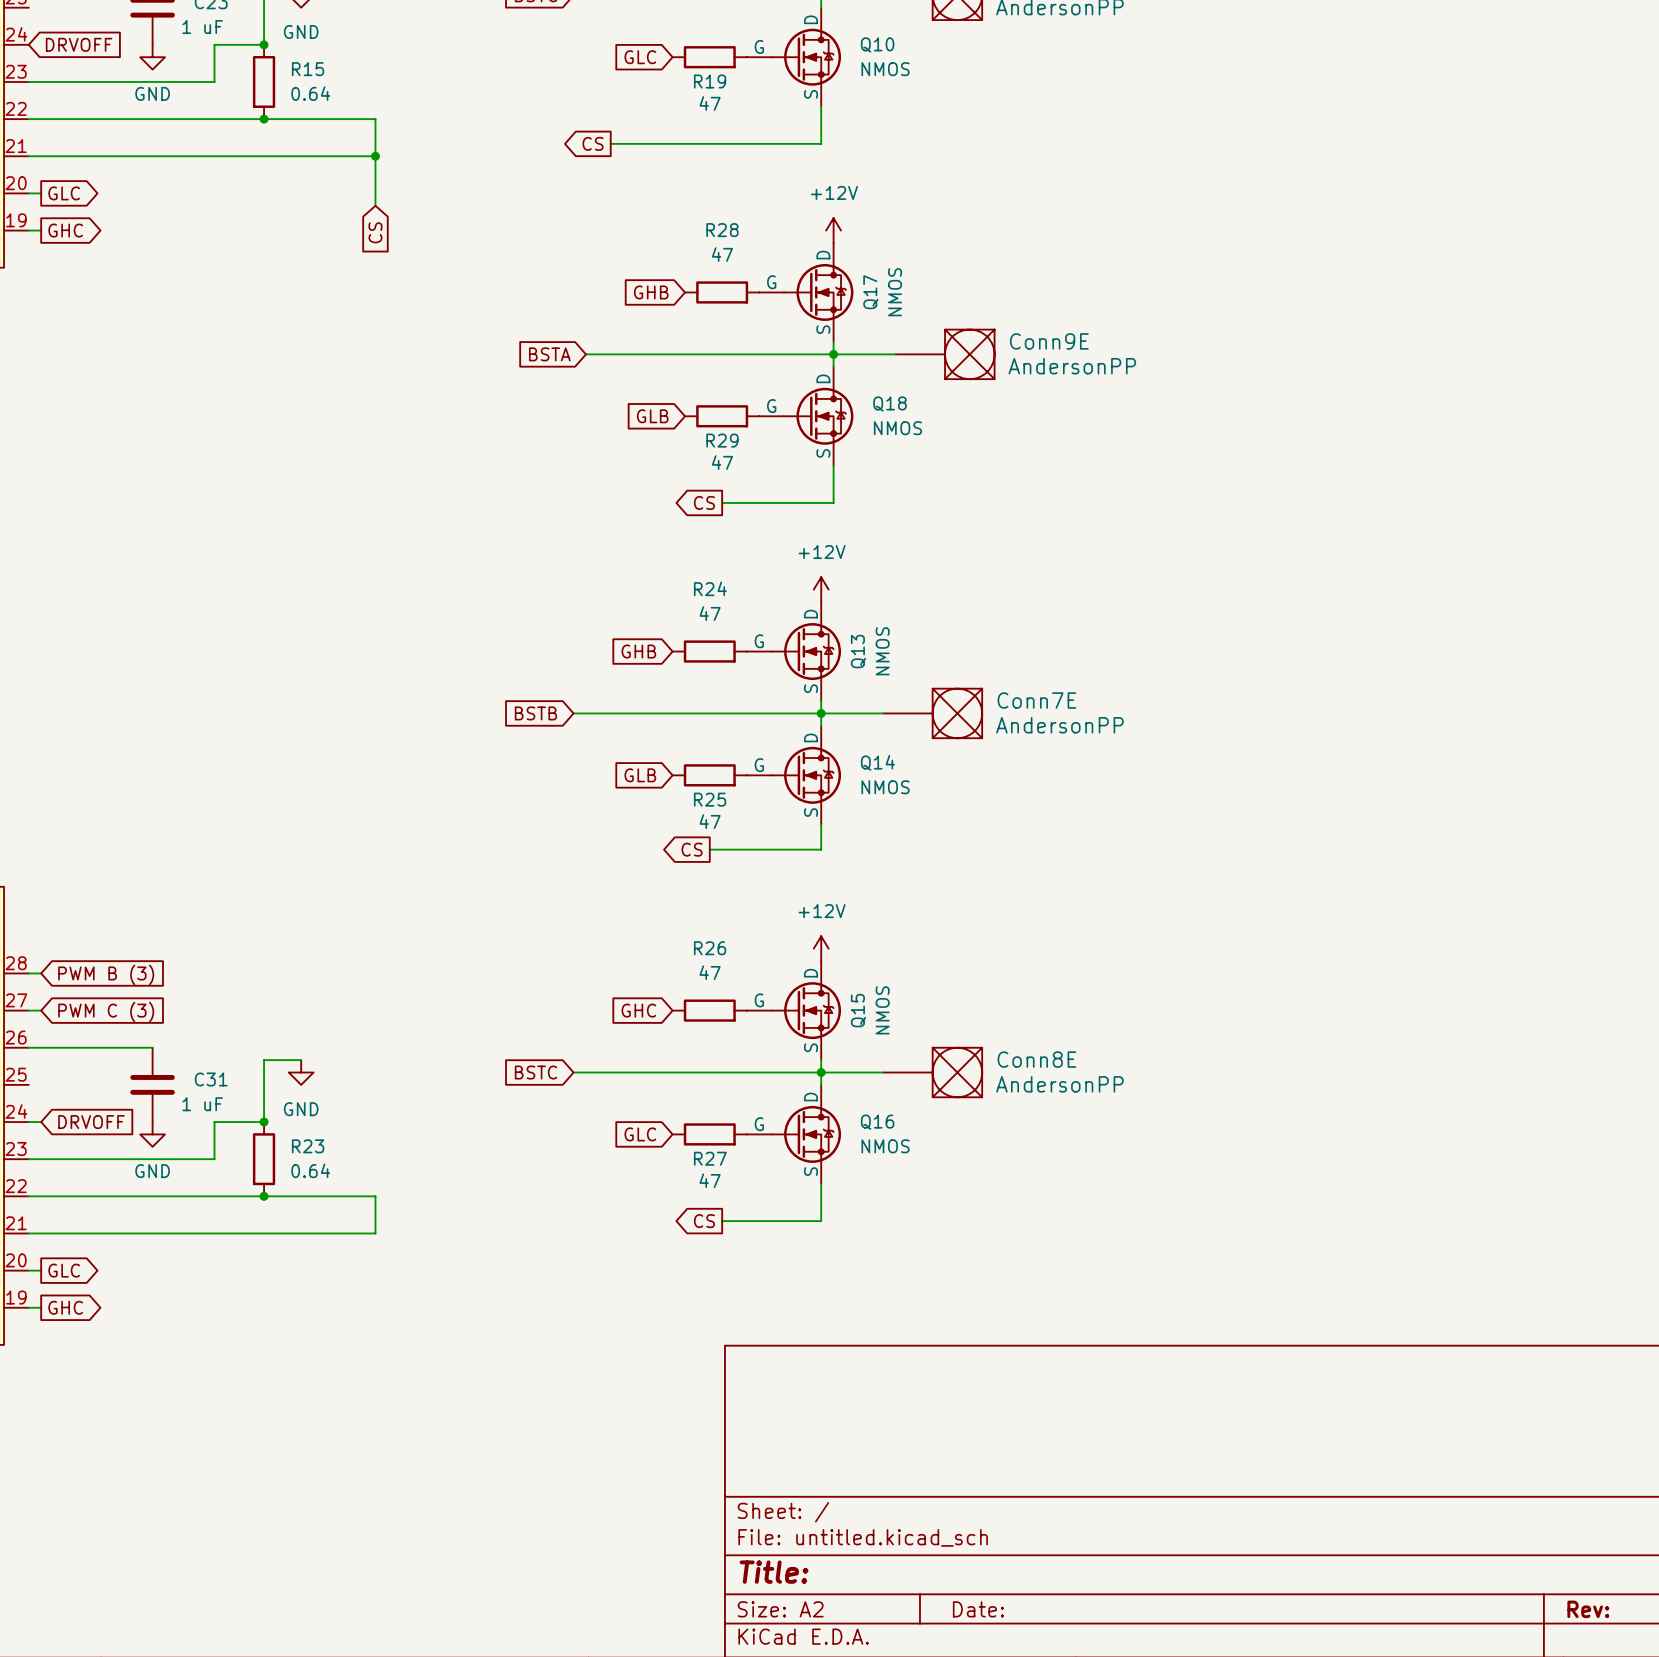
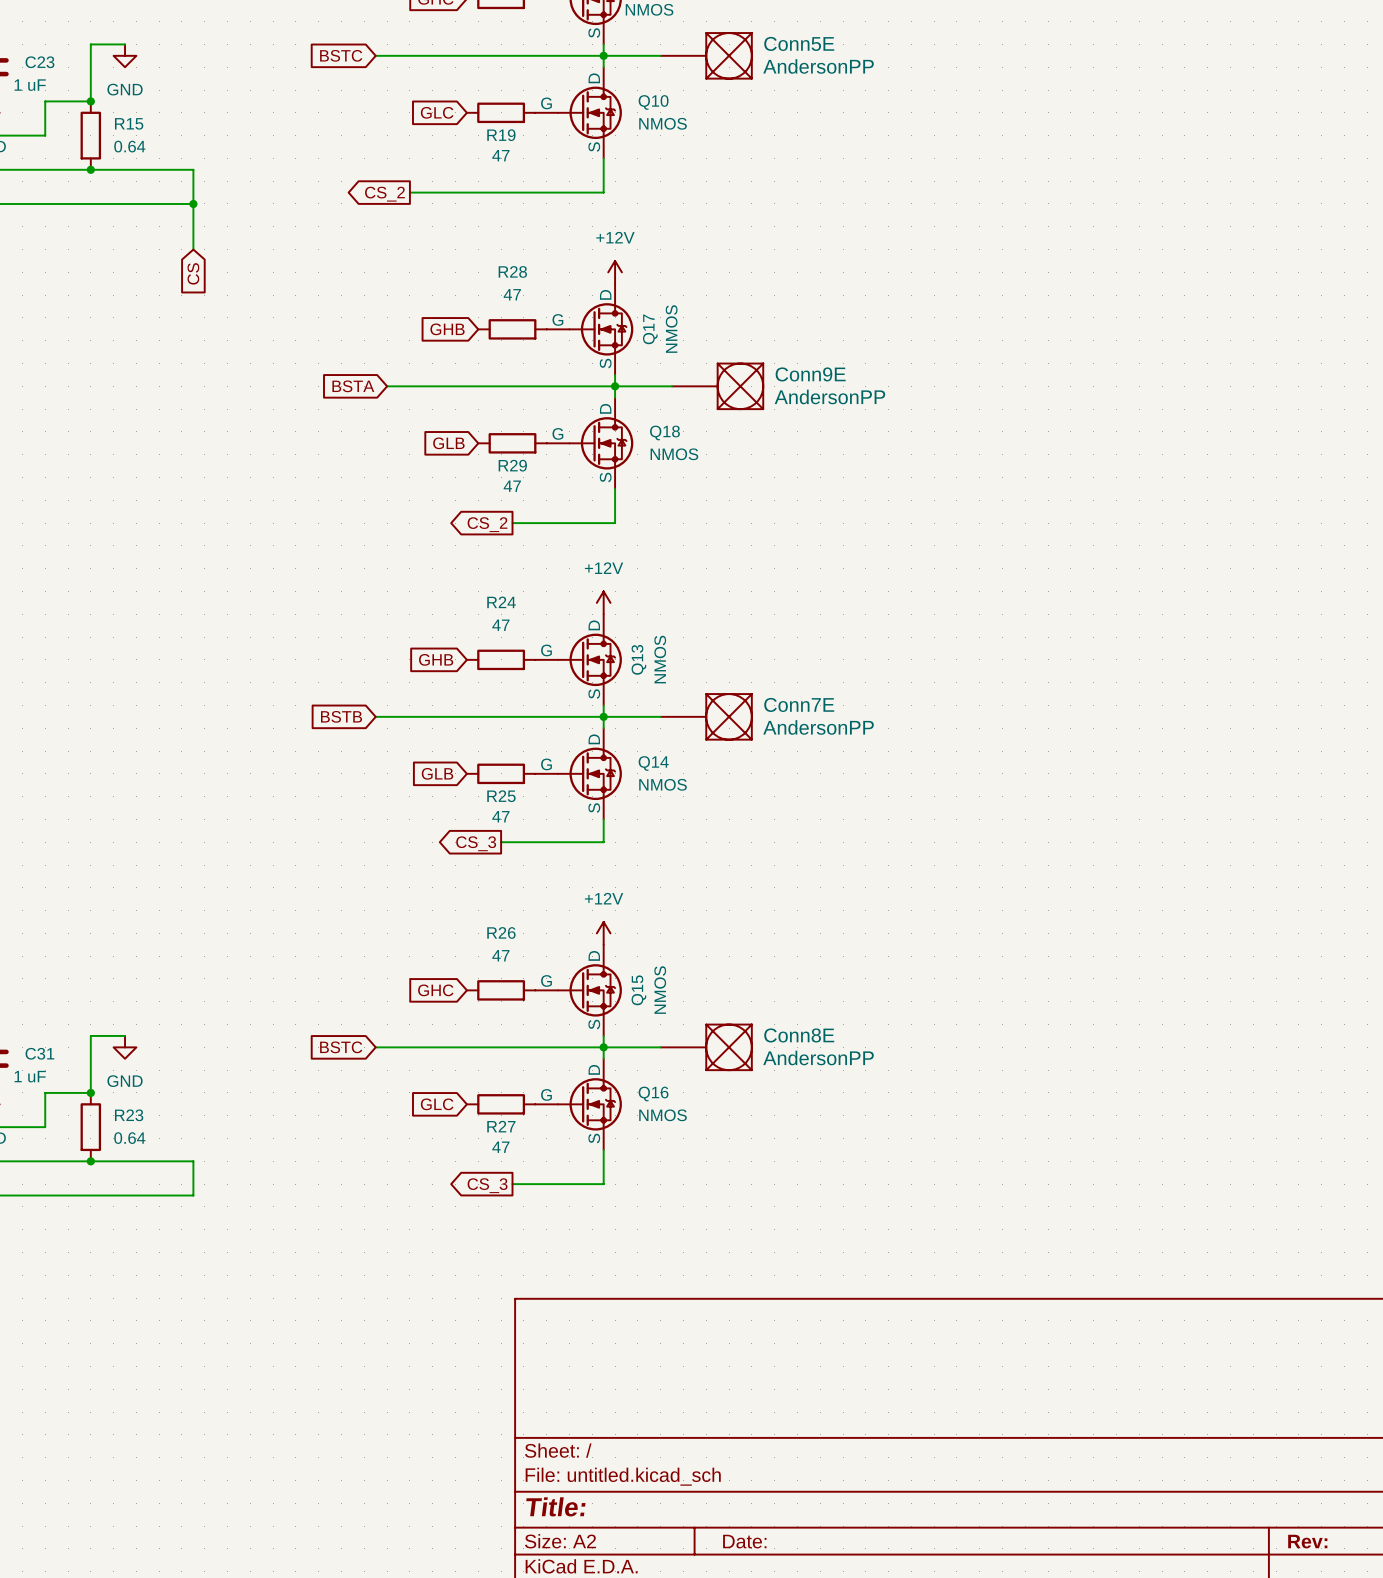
global label: CS (593, 143) -> CS_2 (384, 194)
global label: CS (704, 502) -> CS_2 (487, 524)
global label: CS (692, 849) -> CS_3 (476, 843)
global label: CS (704, 1221) -> CS_3 (487, 1185)

